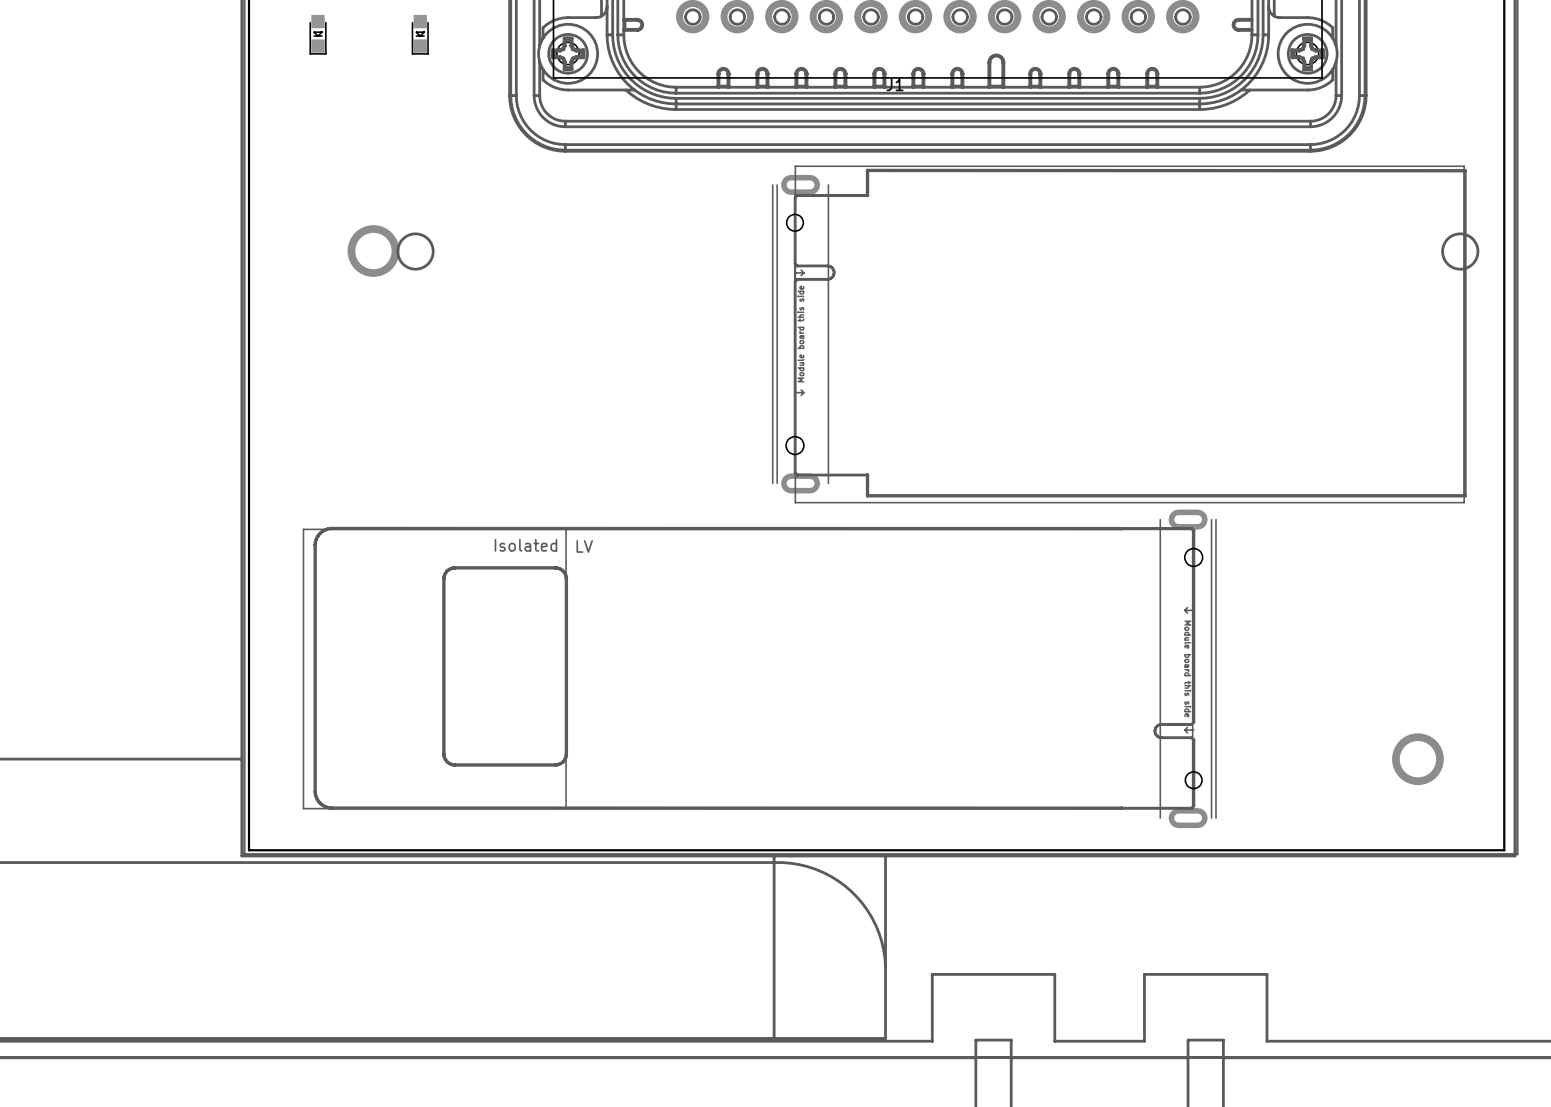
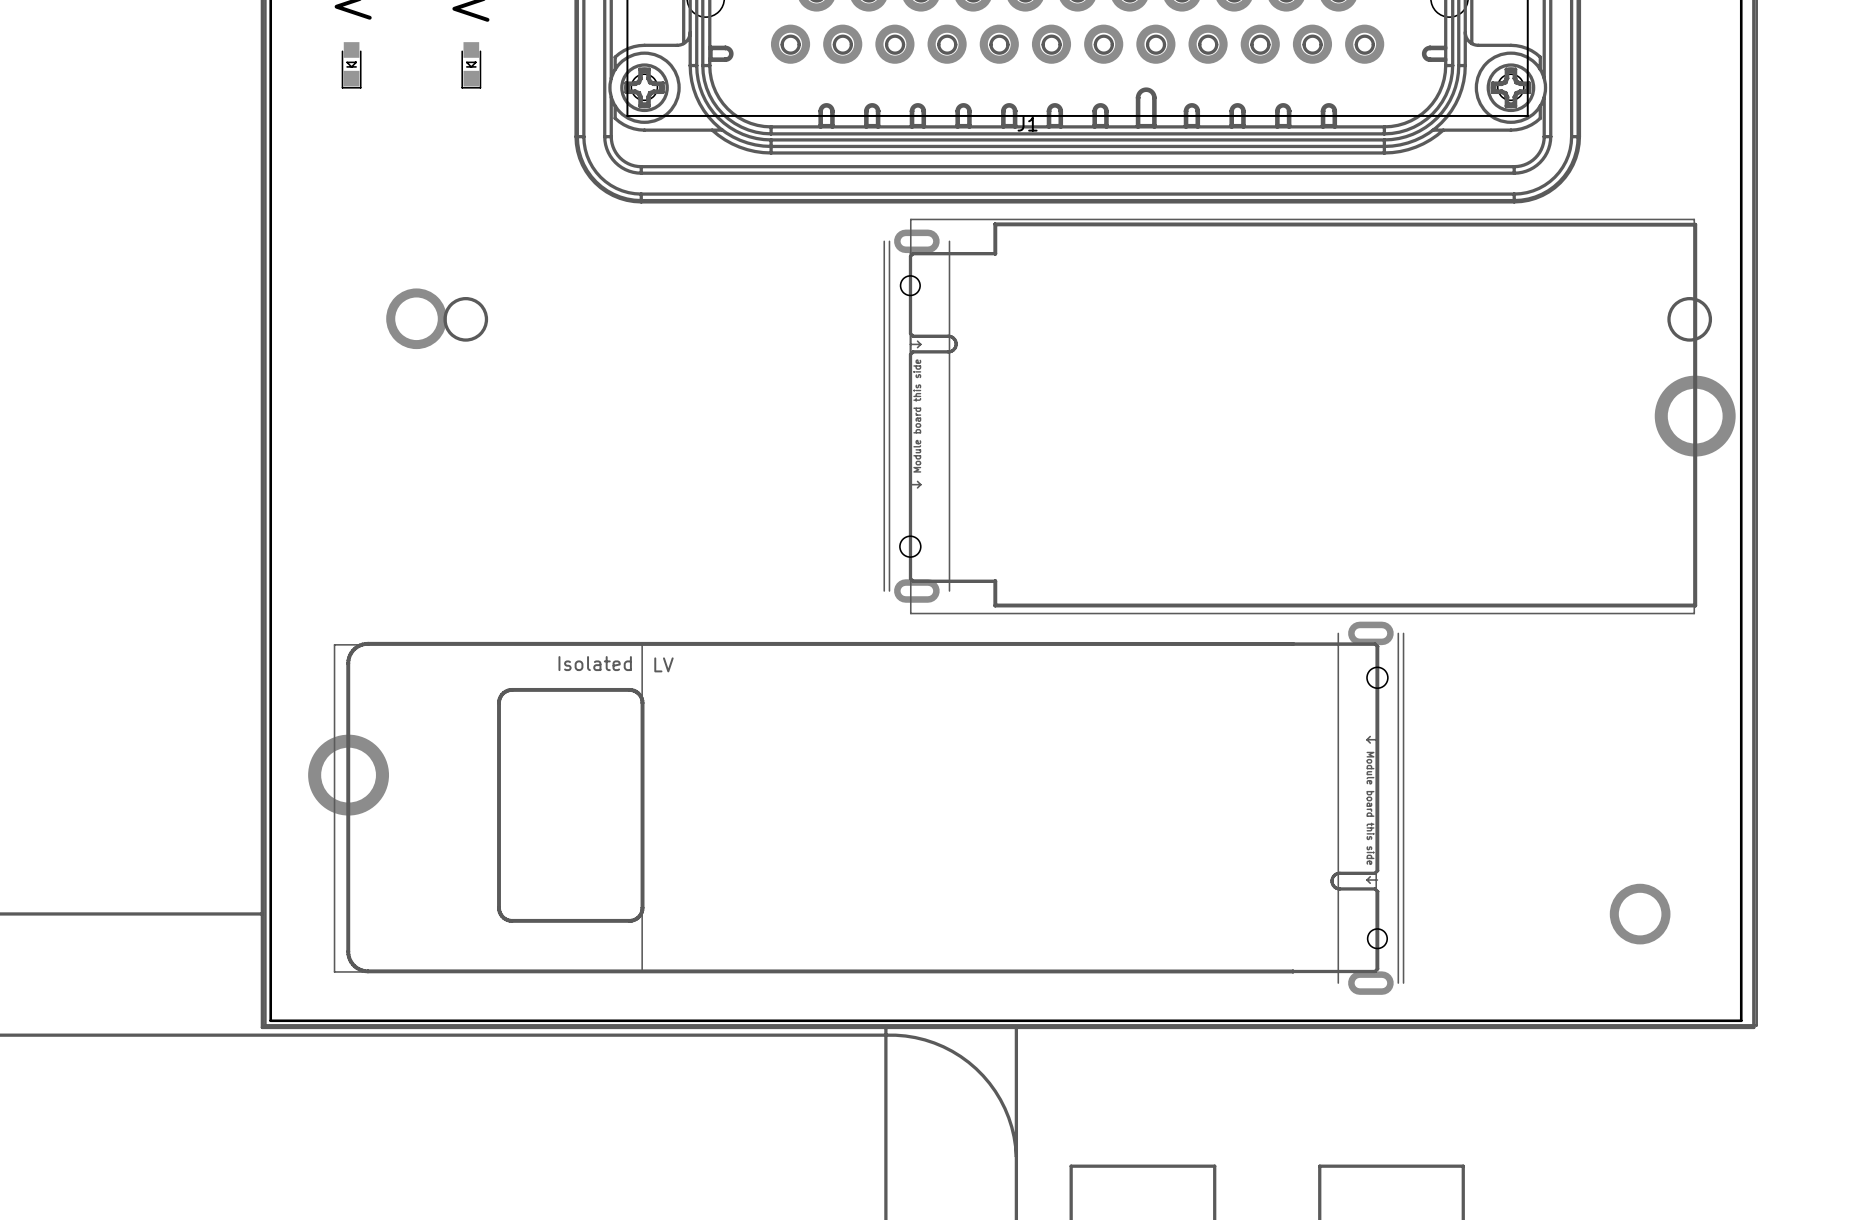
part: (1119, 333) -> none
part: none -> (1309, 414)
part: none -> (855, 808)
part: (764, 668) -> none

